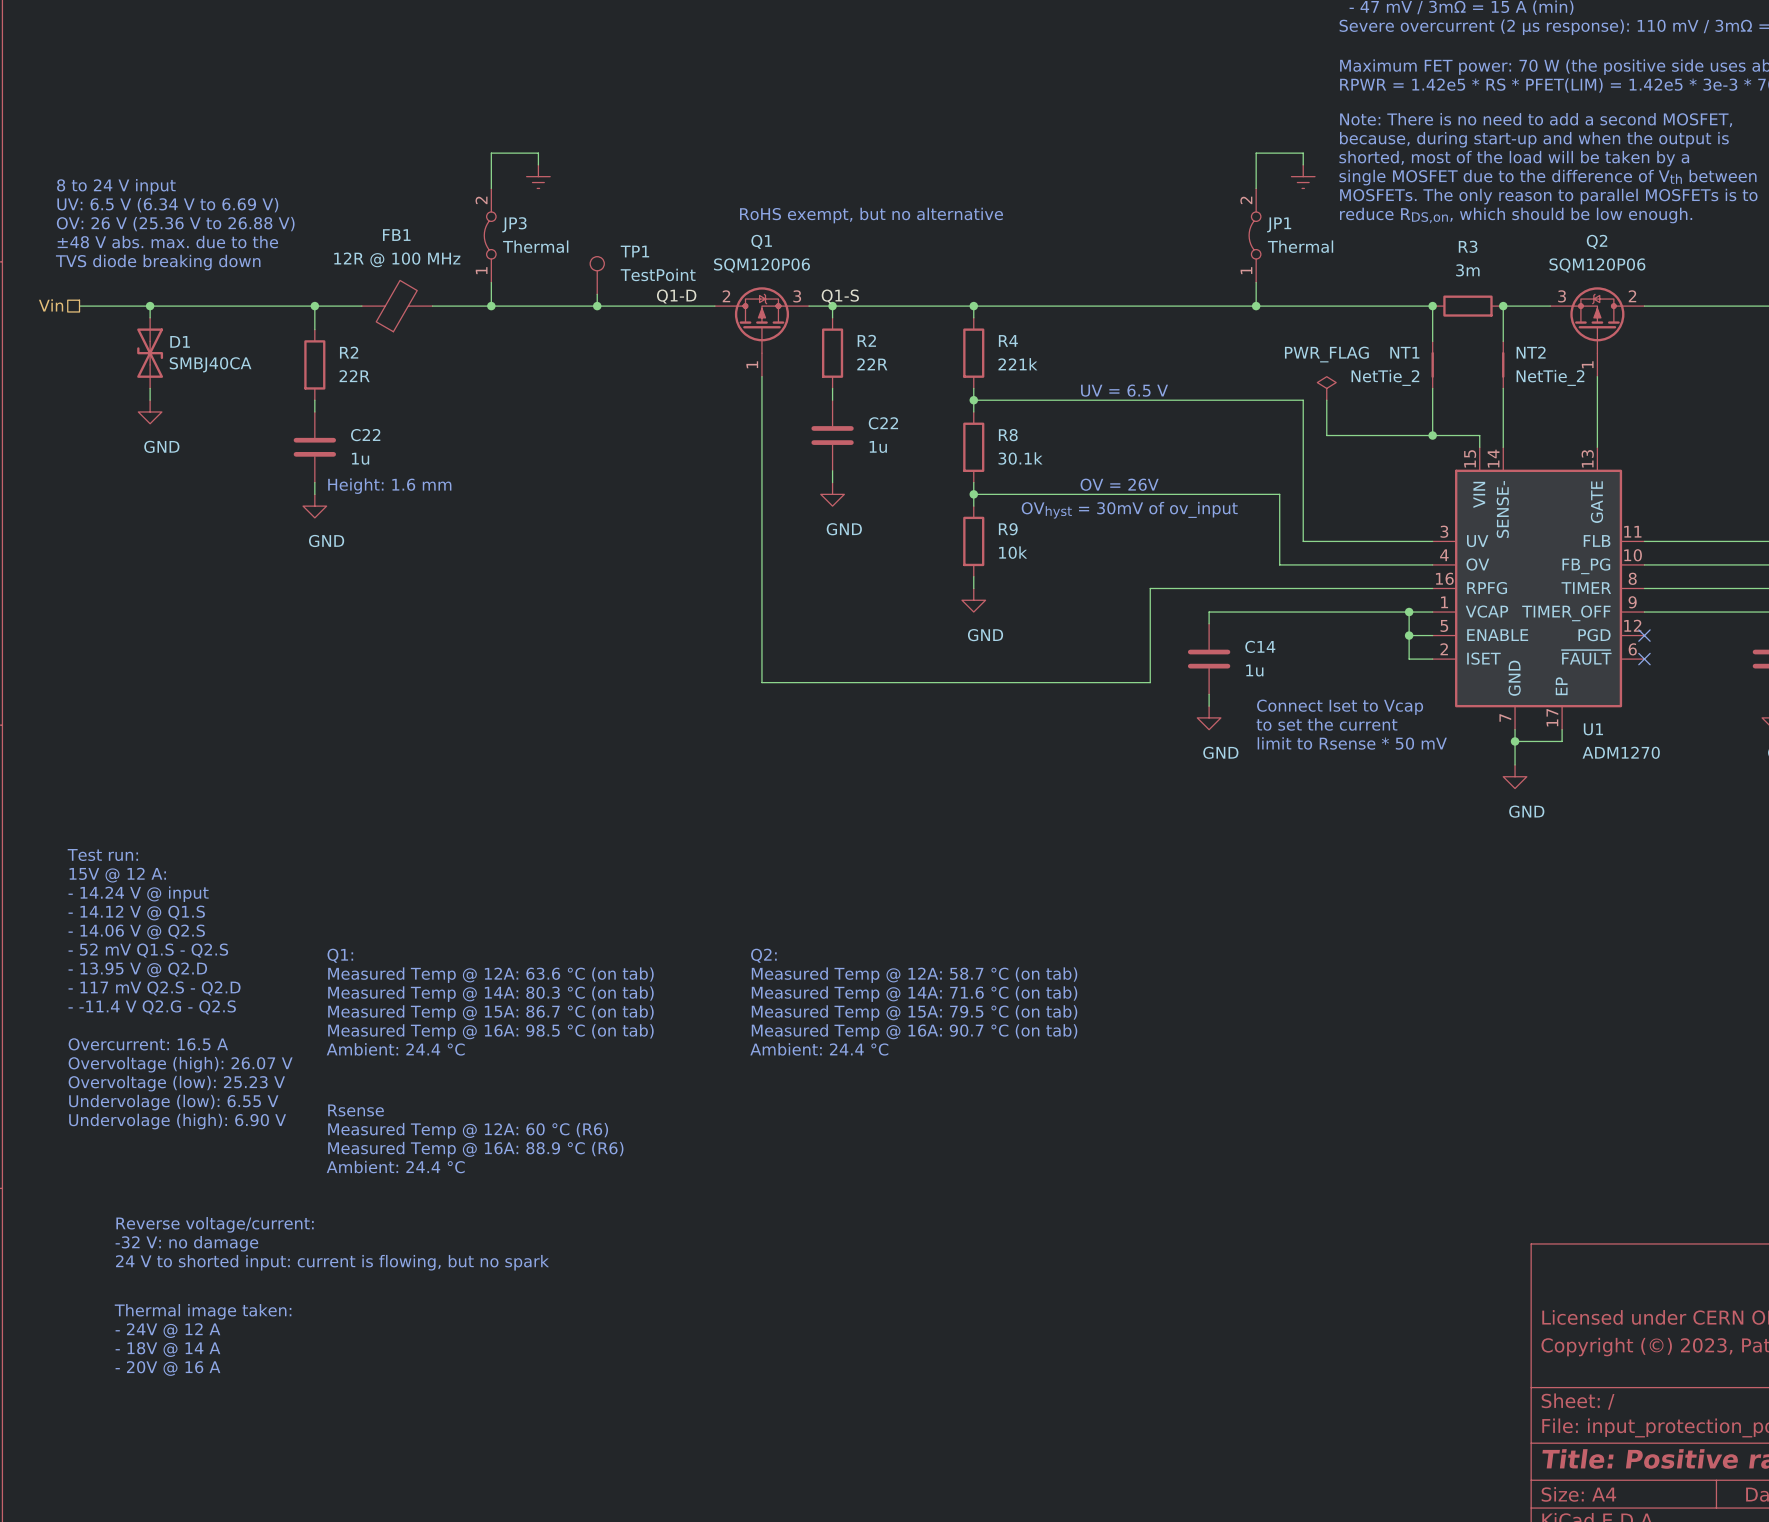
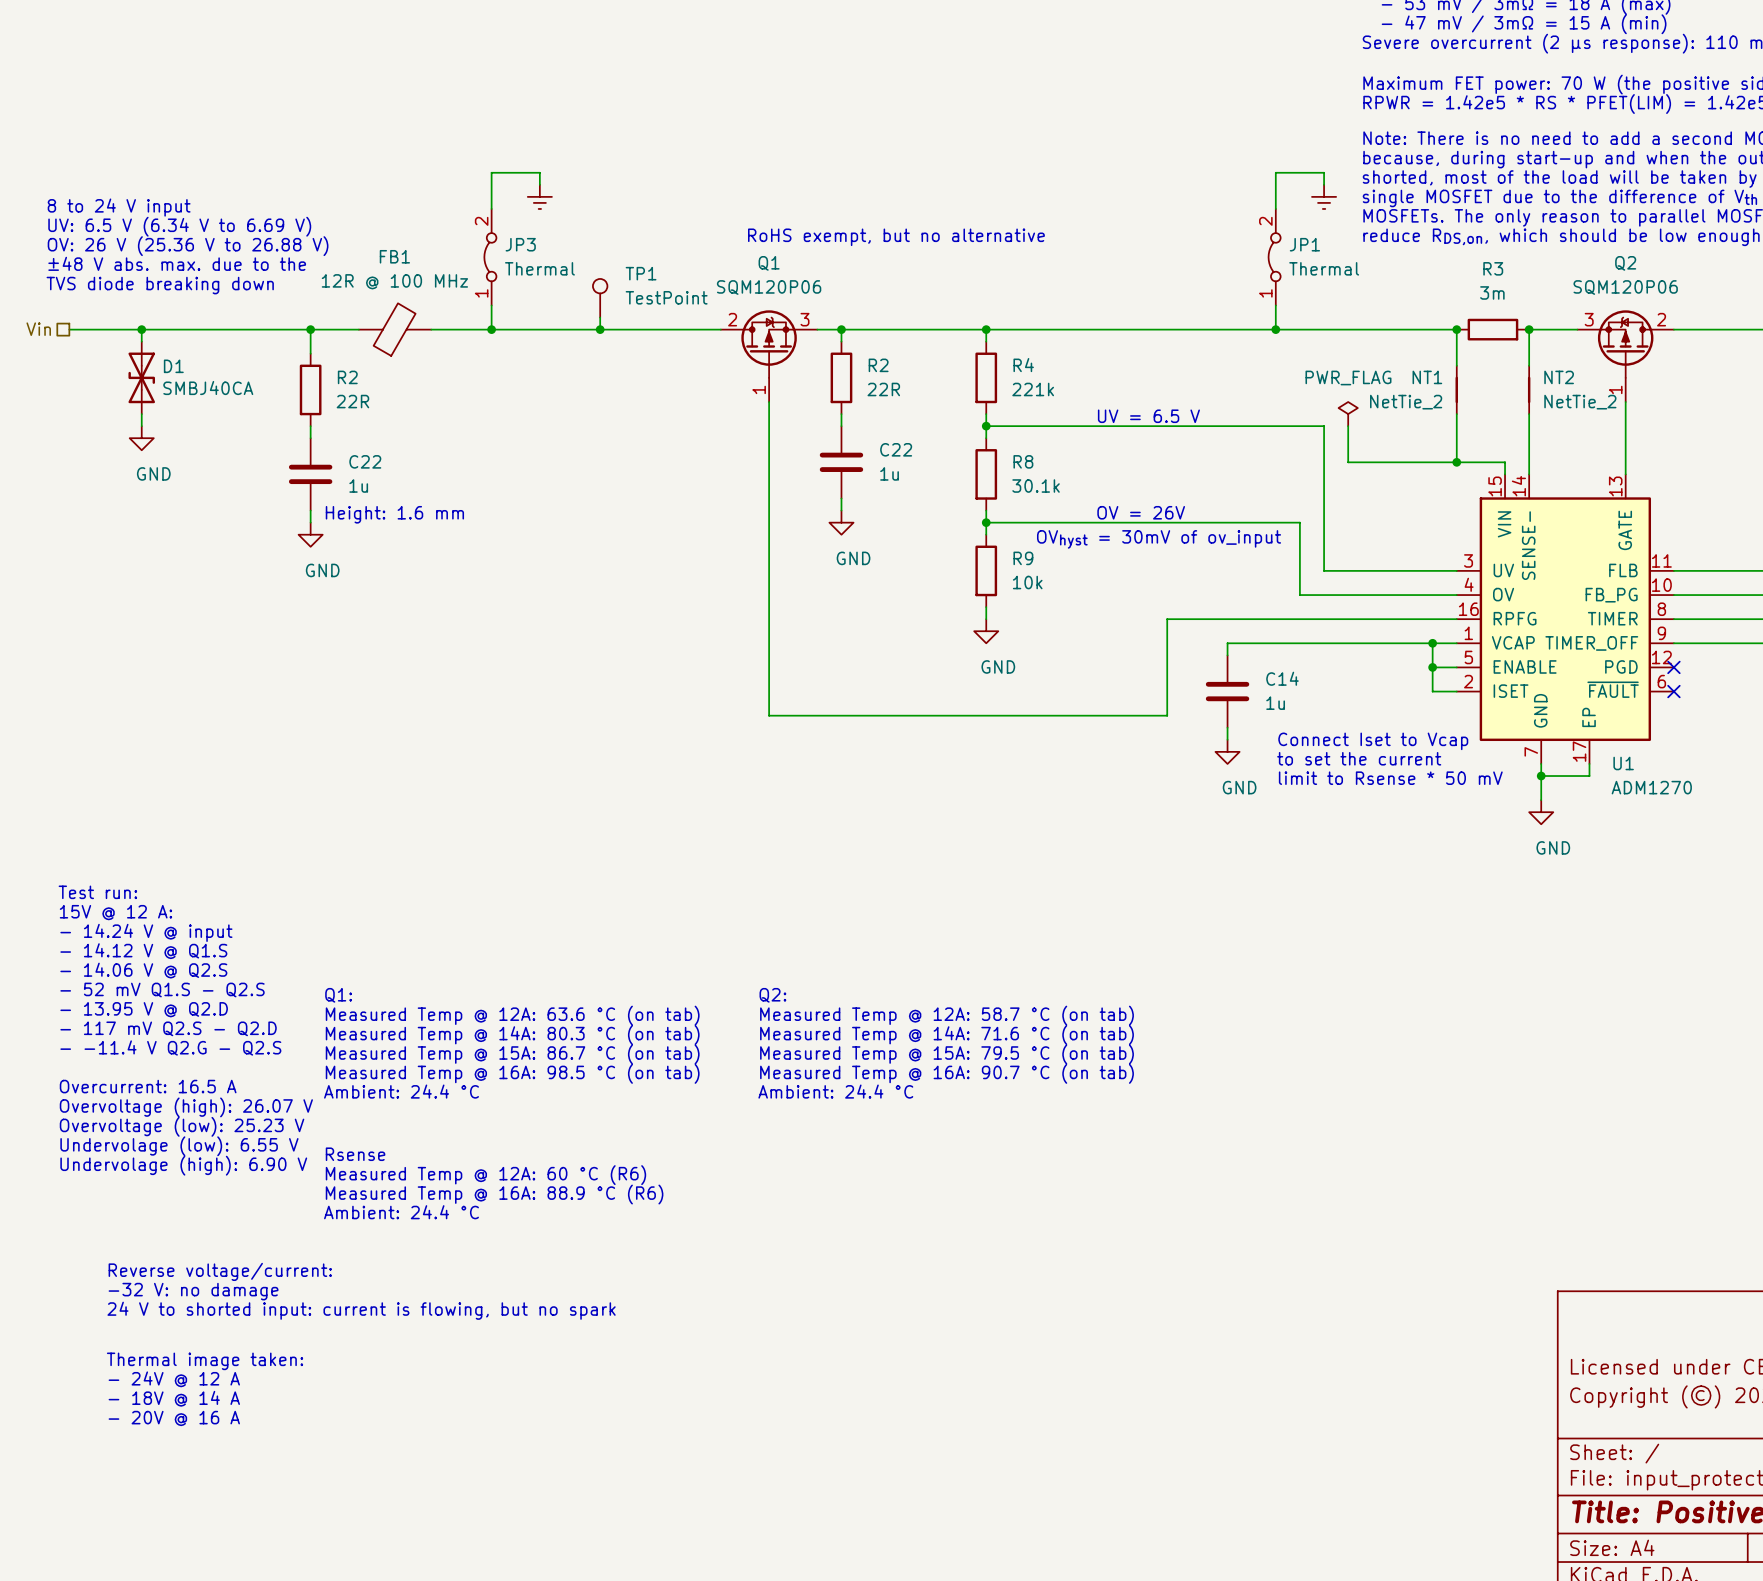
label: Q1-D (676, 296) -> none
label: Q1-S (840, 296) -> none

